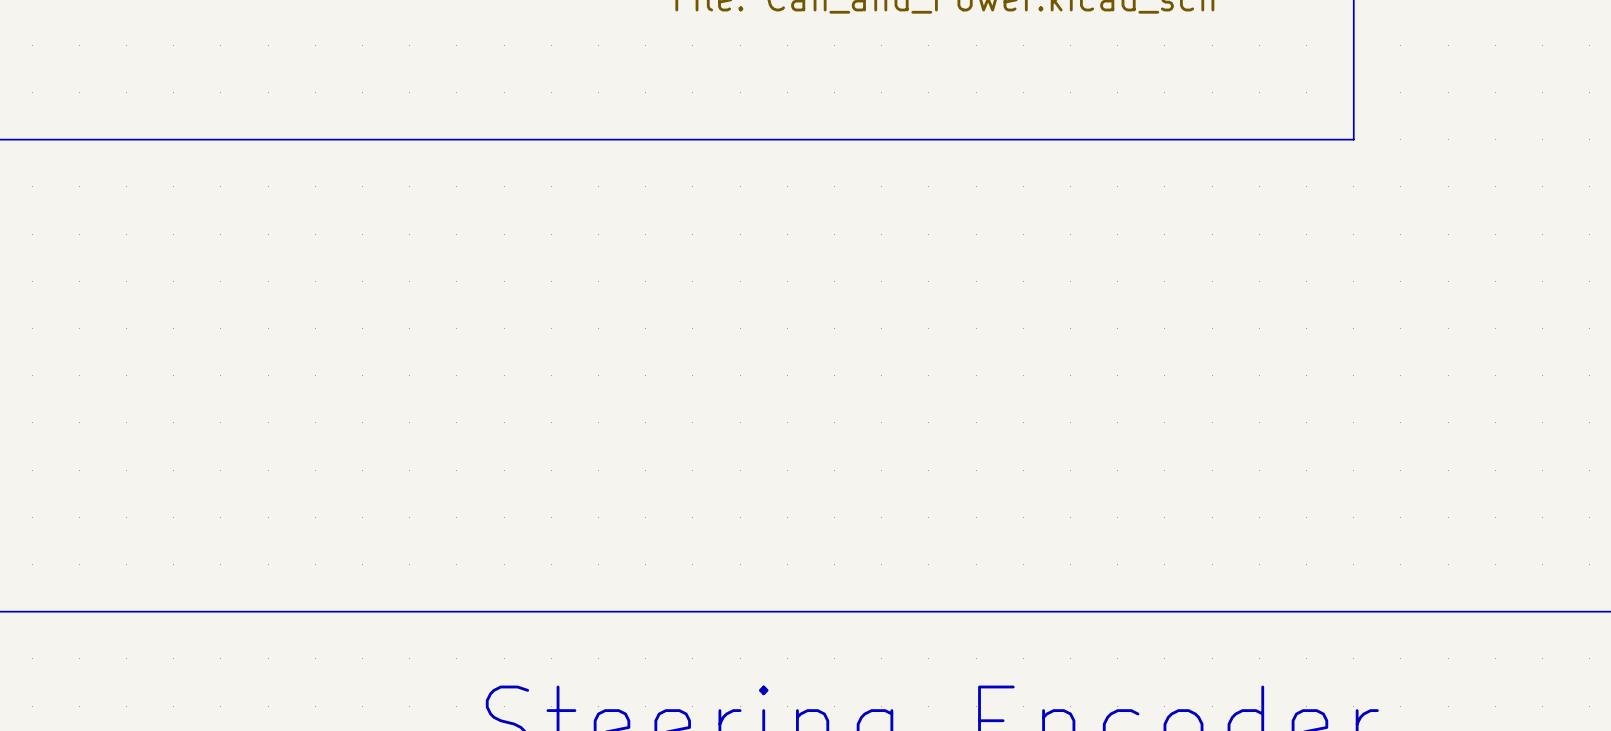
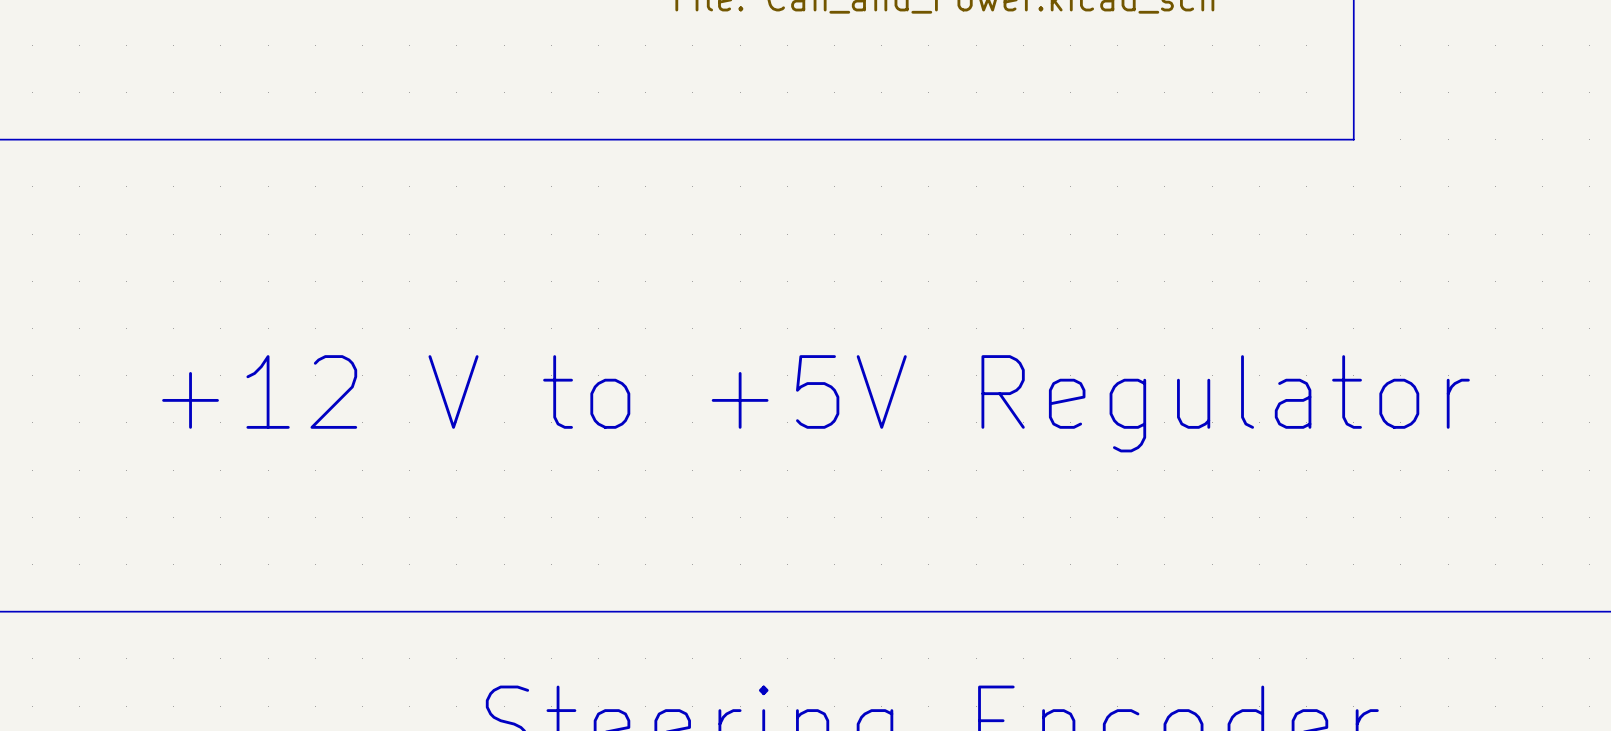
text: none -> +12 V to +5V Regulator (815, 403)

